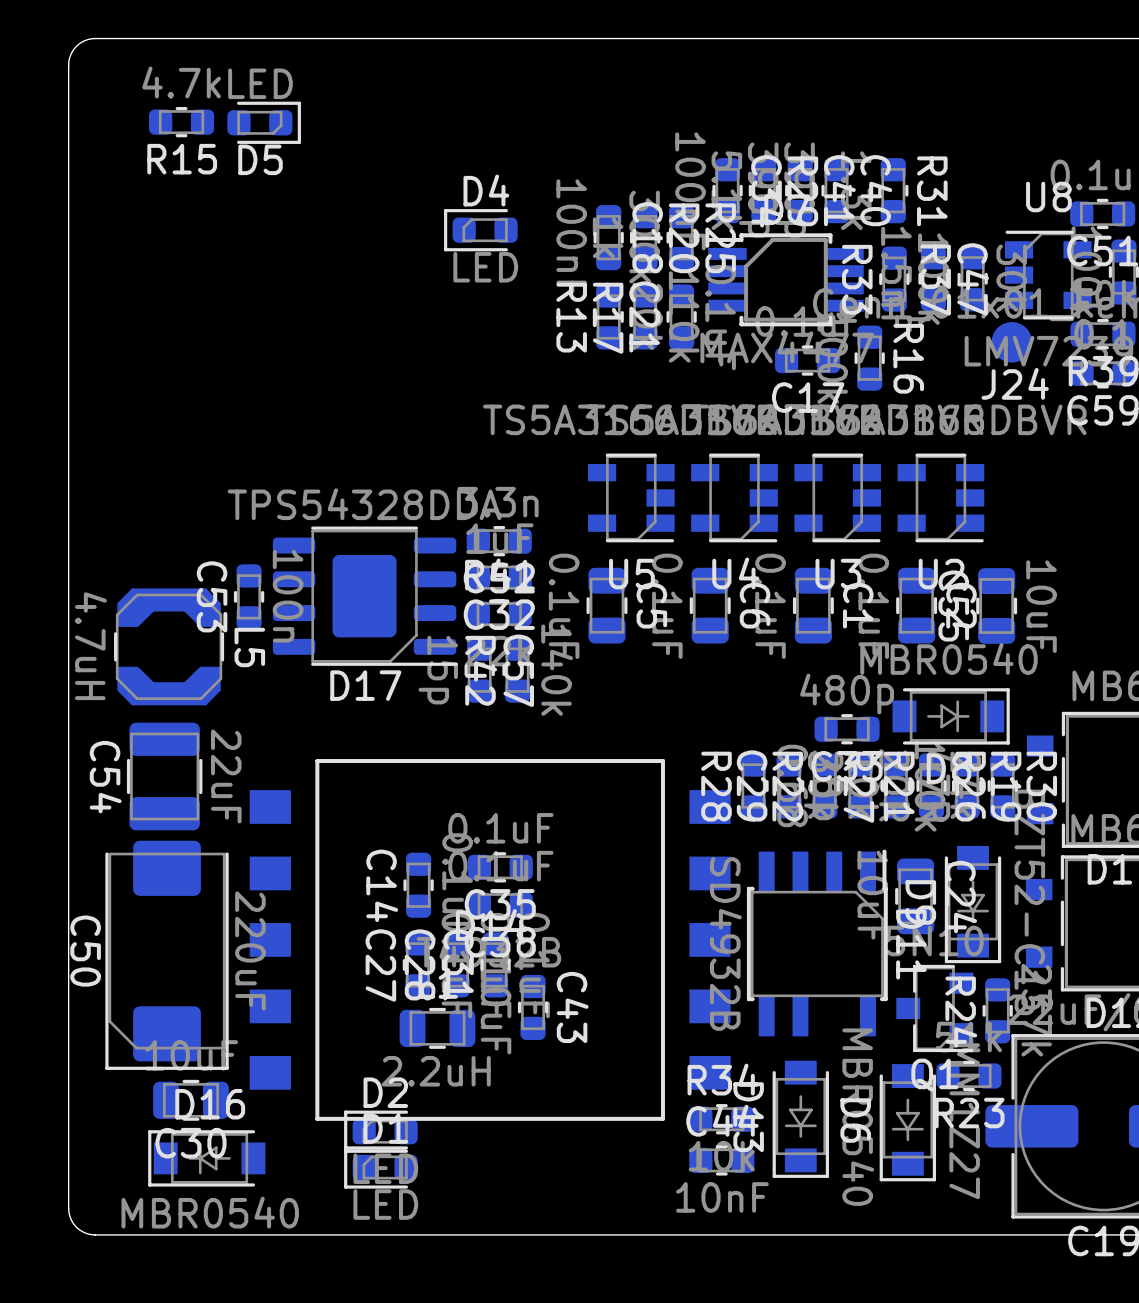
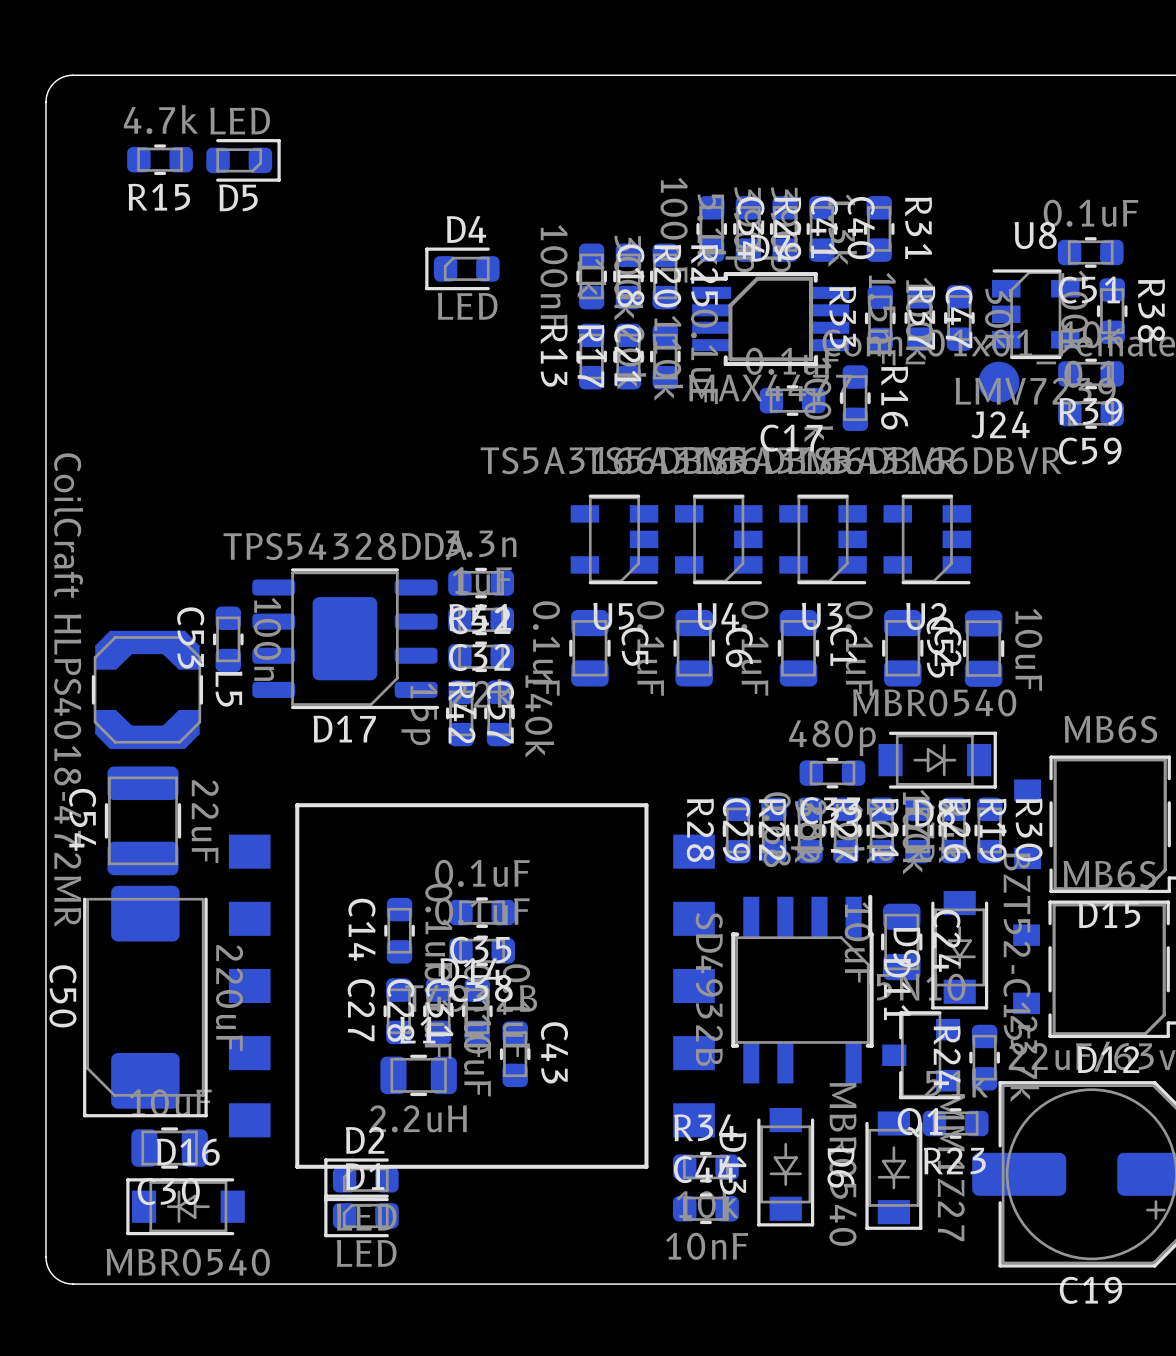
L5 value: 4.7uH (90, 646) -> CoilCraft HLPS4018-472MR (68, 690)

